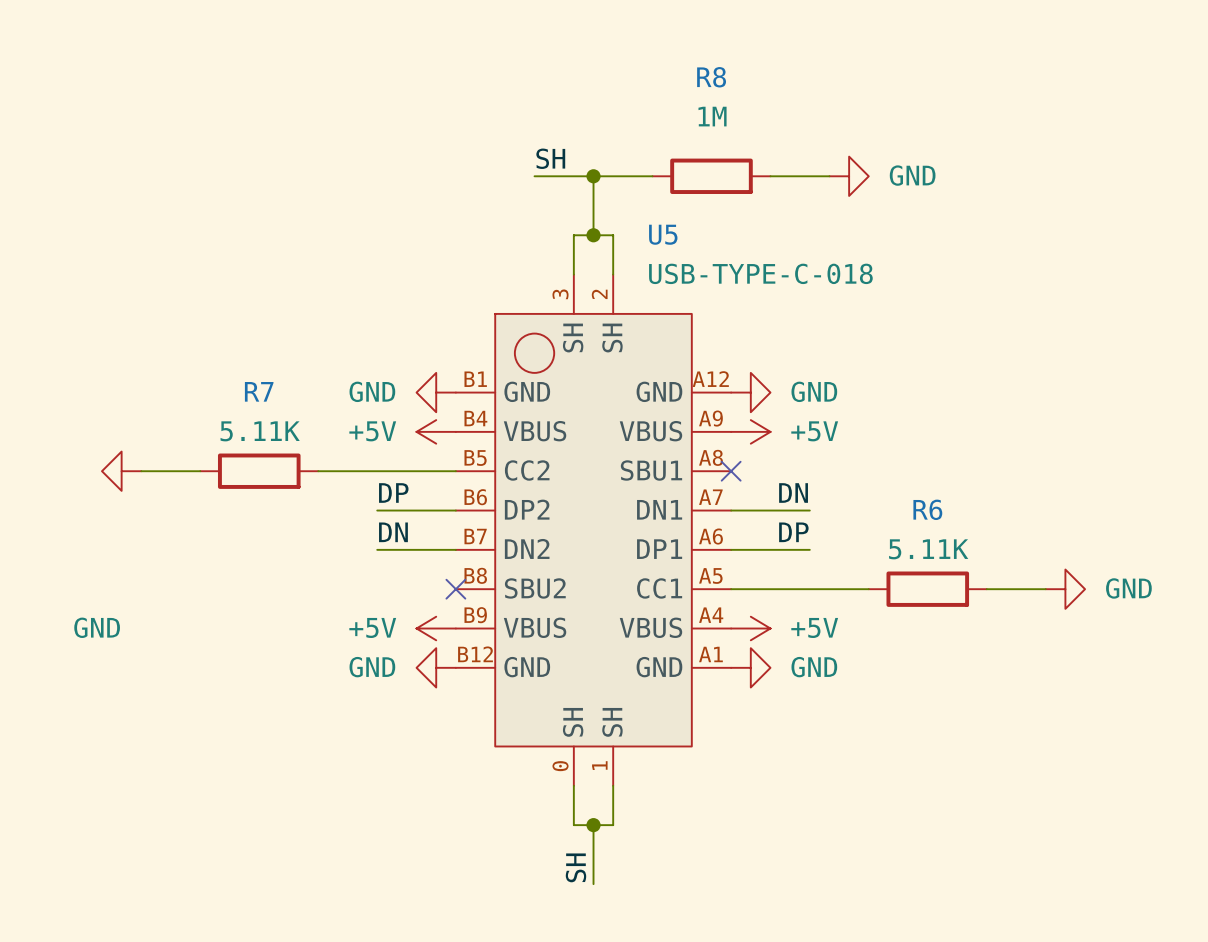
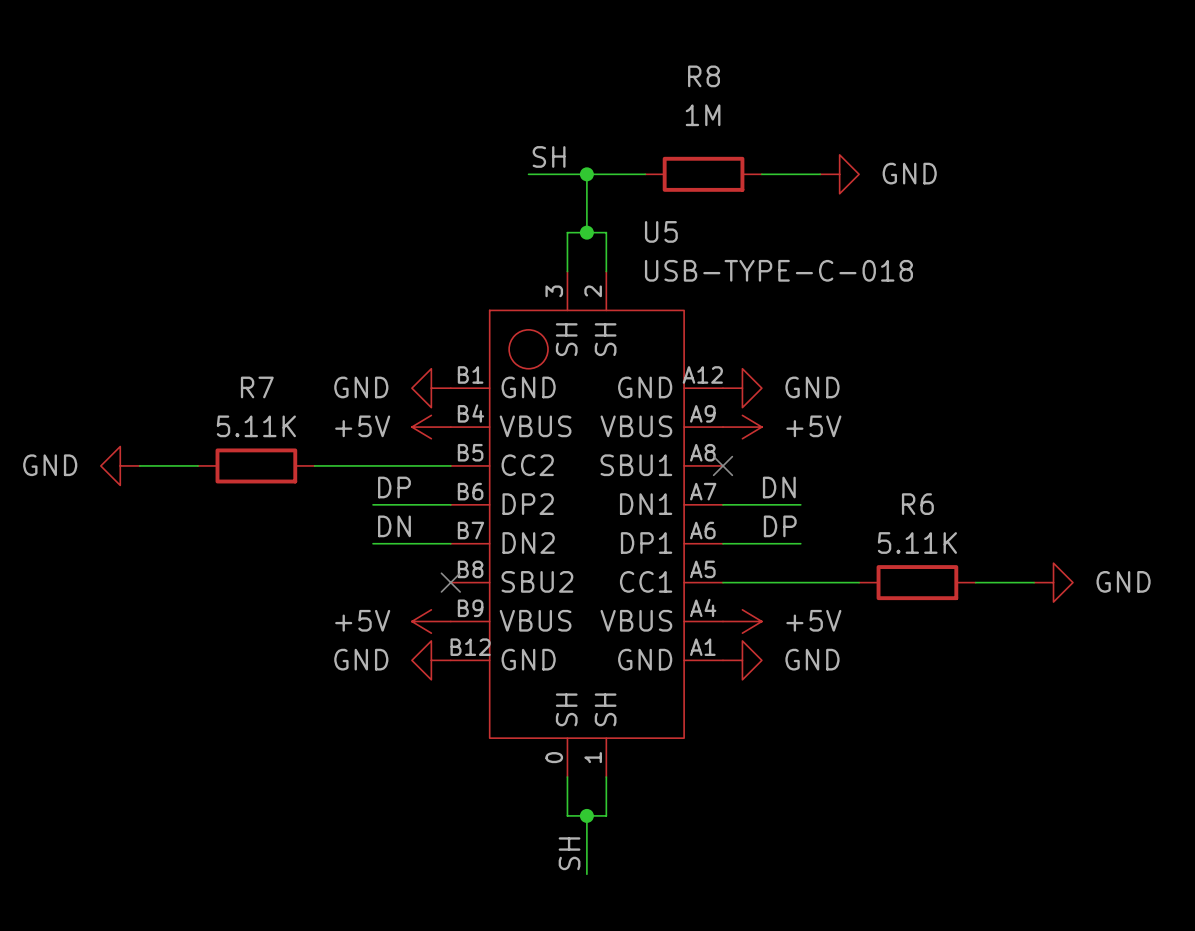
power symbol text position: GND (97, 627) -> GND (50, 465)

